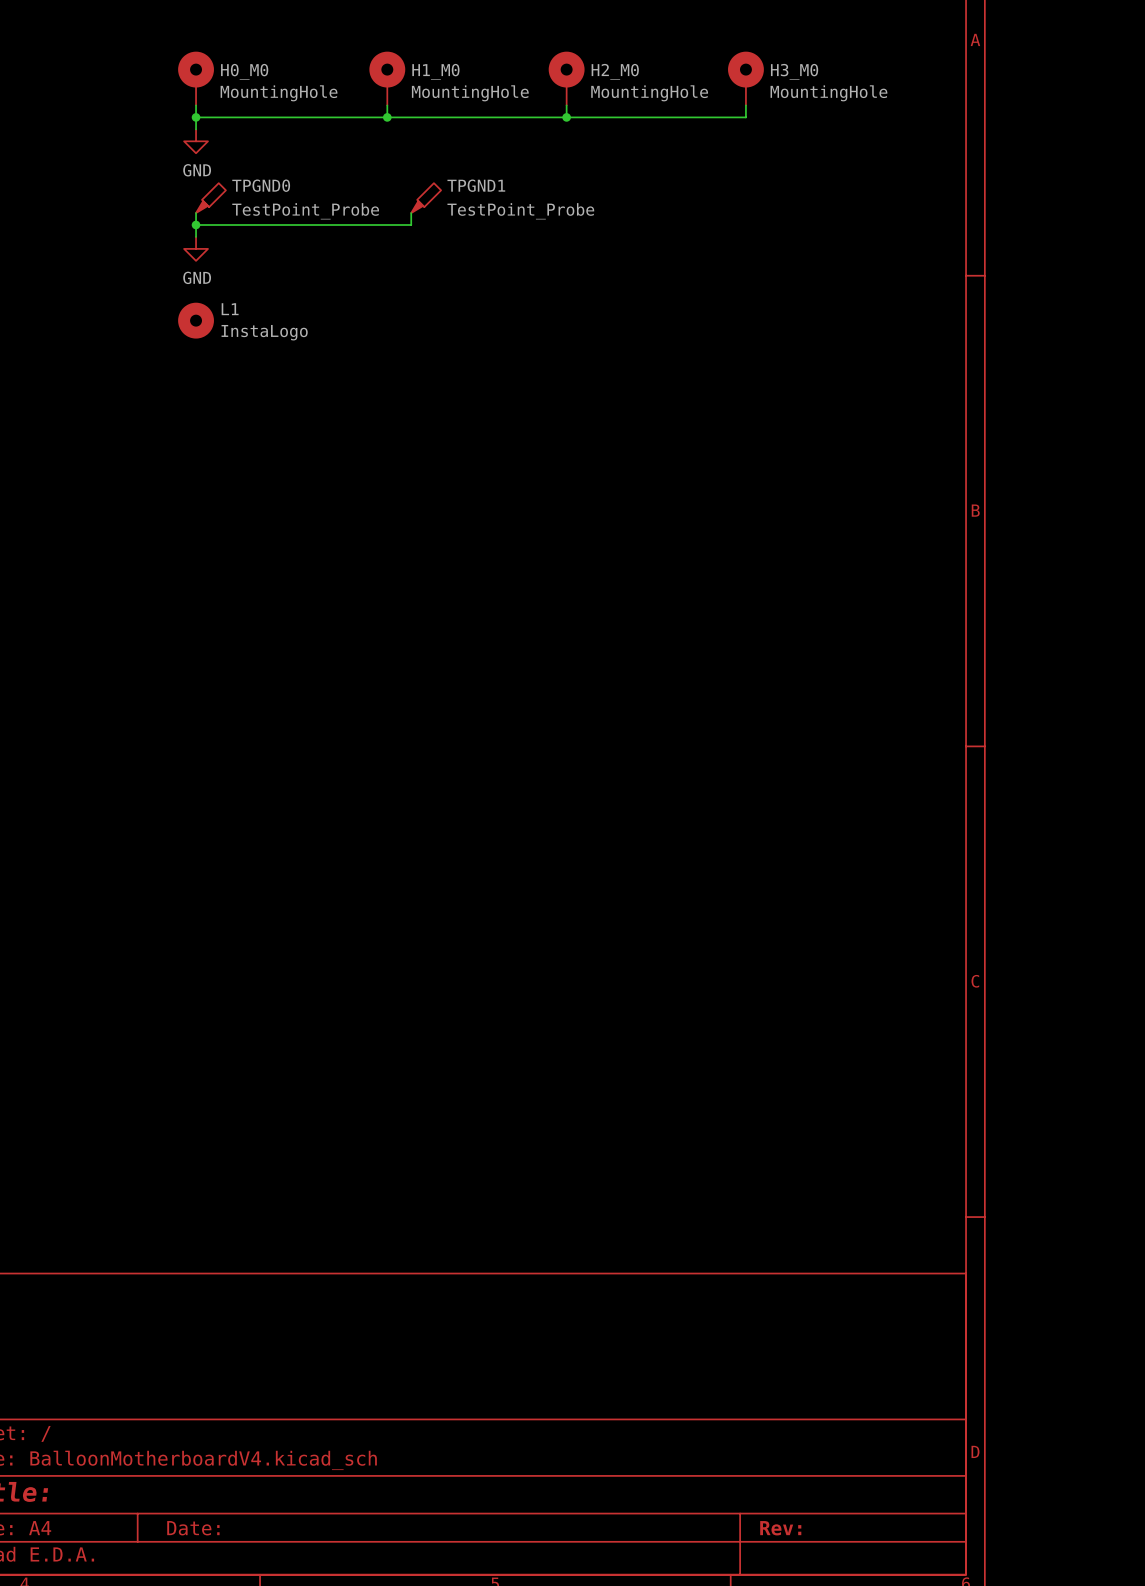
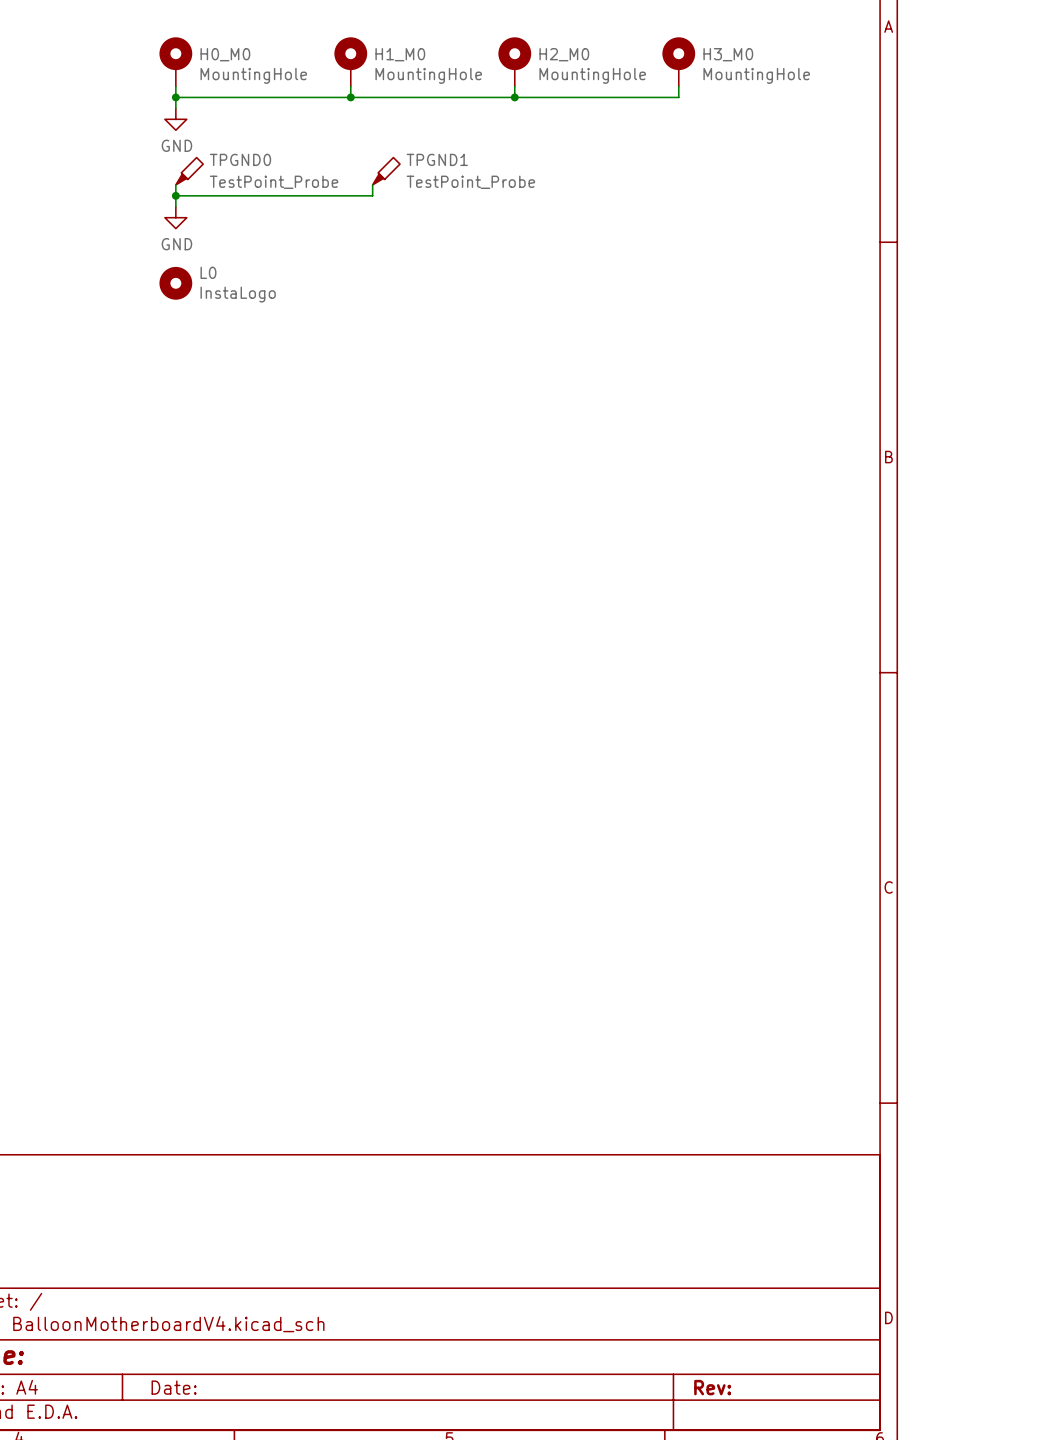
L1 name: L1 (230, 309) -> L0 (208, 272)

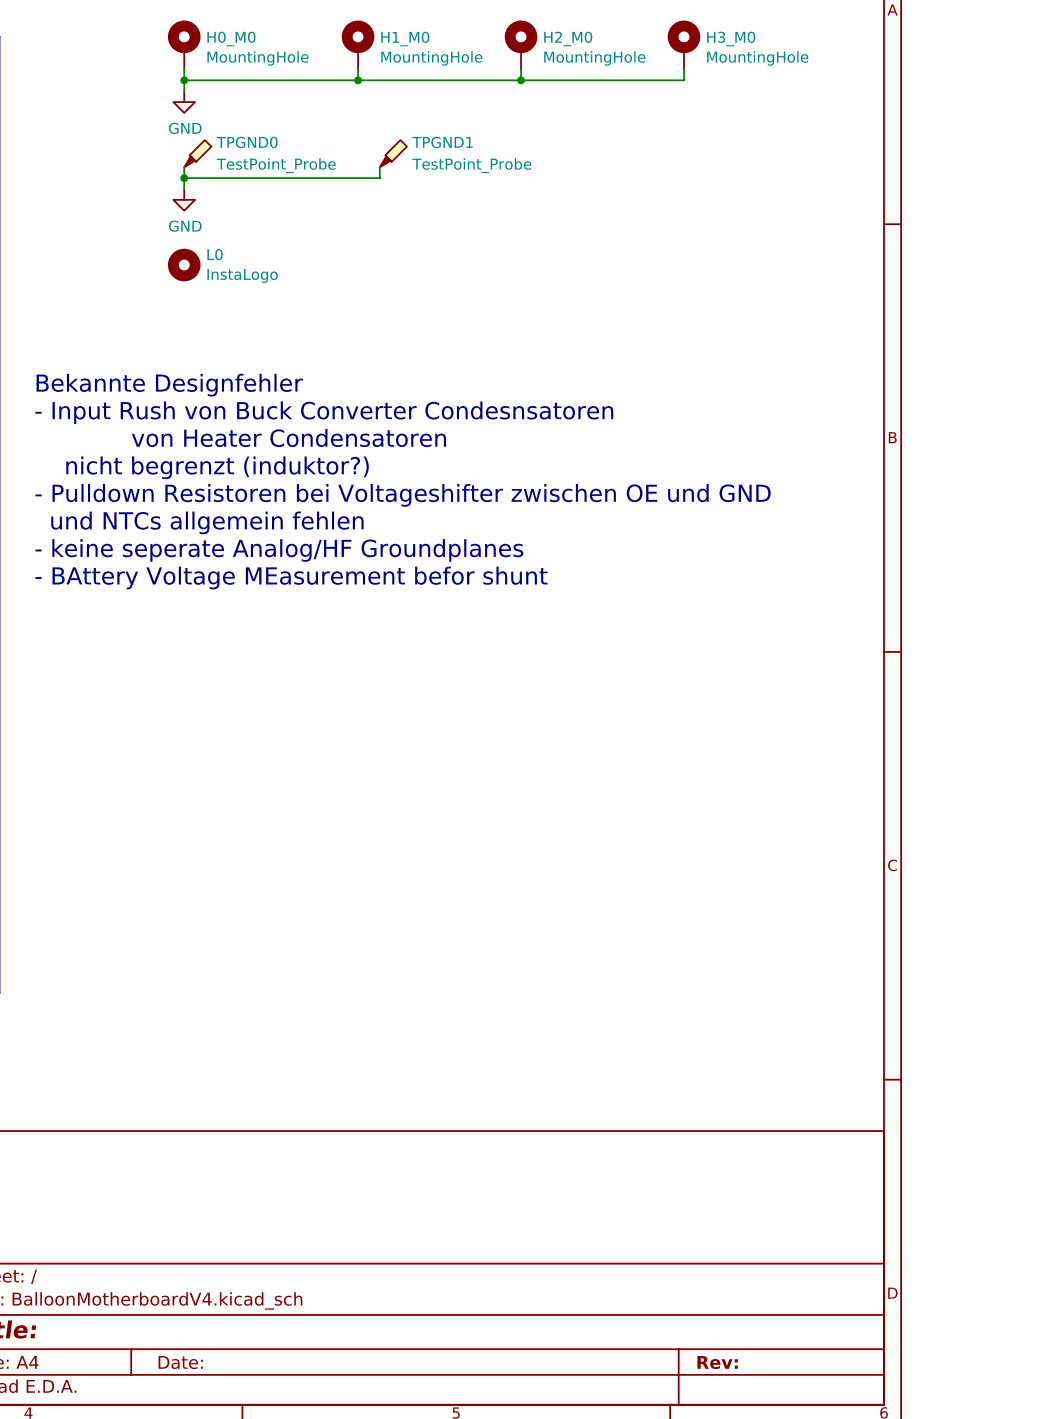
text: none -> Bekannte Designfehler (169, 385)
text: none -> - Input Rush von Buck Converter Condesnsatoren (324, 412)
text: none -> von Heater Condensatoren (289, 437)
text: none -> nicht begrenzt (induktor?) (217, 467)
text: none -> - Pulldown Resistoren bei Voltageshifter zwischen OE und GND (403, 495)
text: none -> und NTCs allgemein fehlen (207, 522)
text: none -> - keine seperate Analog/HF Groundplanes (279, 550)
text: none -> - BAttery Voltage MEasurement befor shunt (291, 577)

